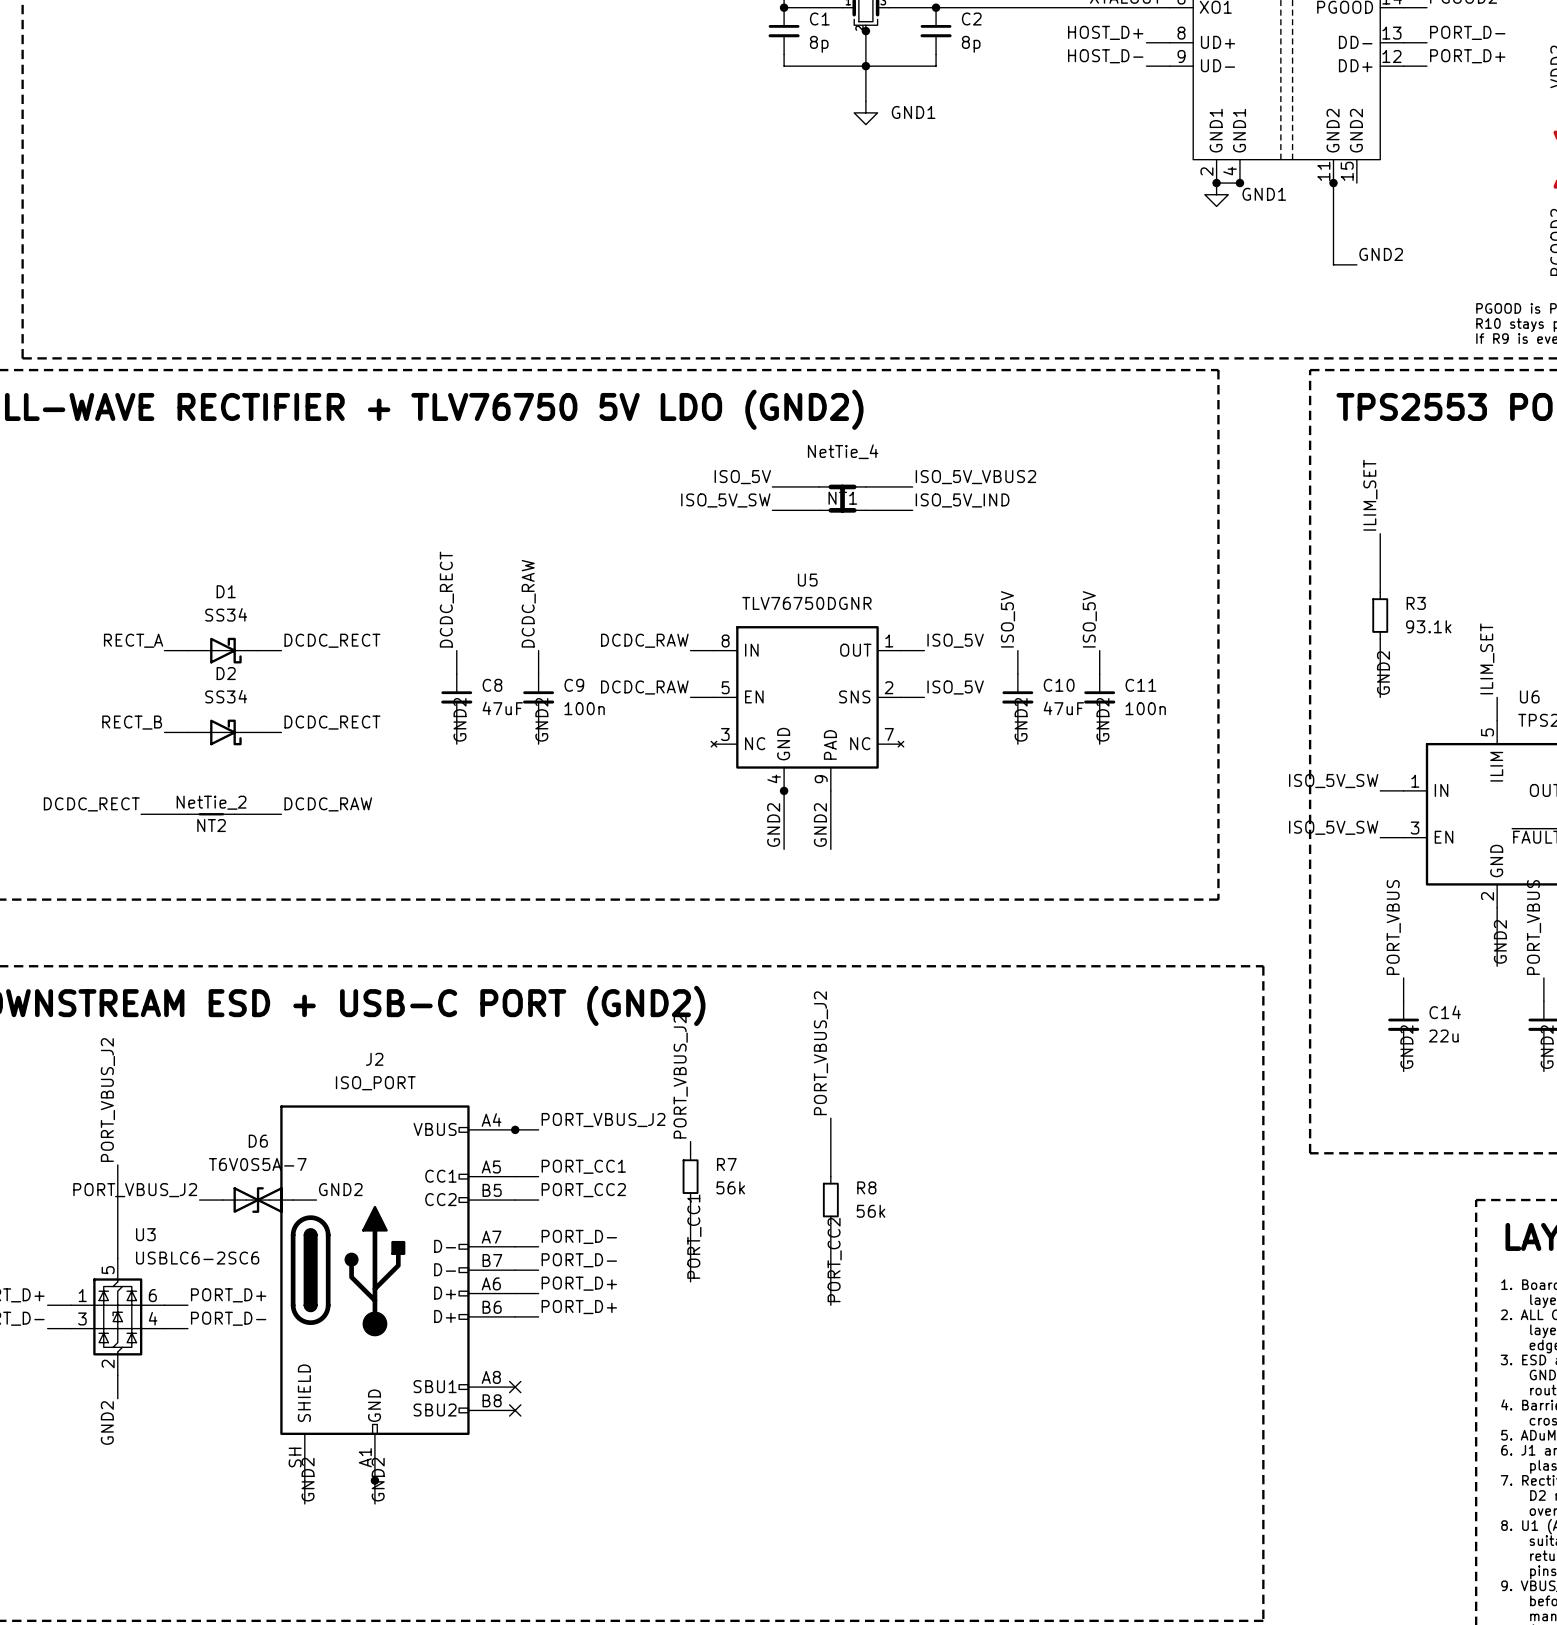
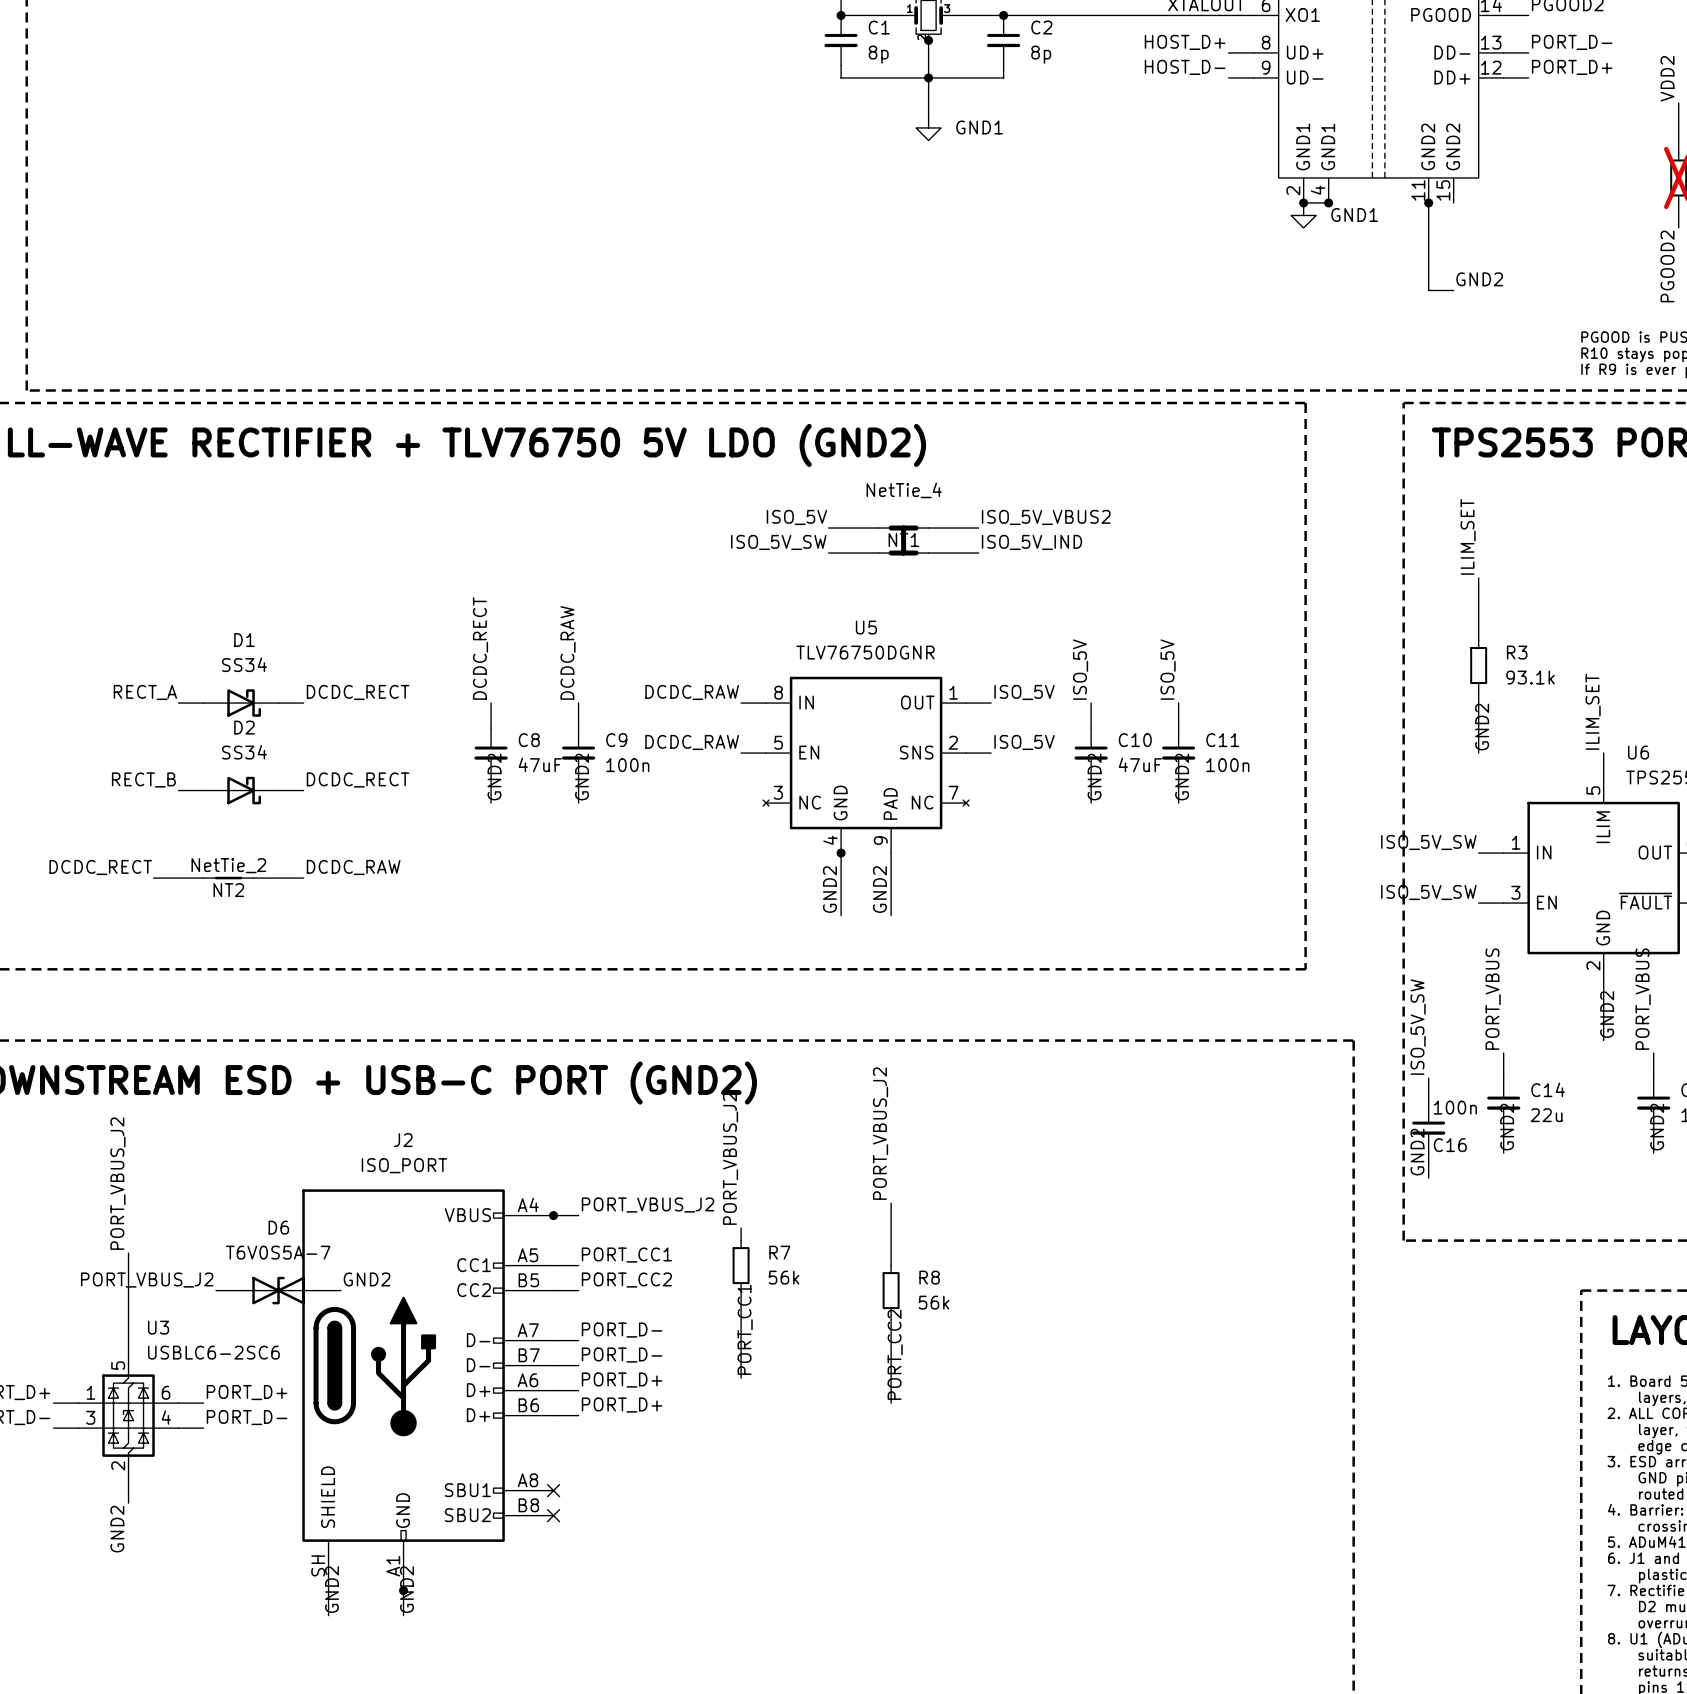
label: none -> ISO_5V_SW (1418, 1027)
wire: none -> (1428, 1078) (1428, 1103)
C16: none -> 100n (1428, 1128)
label: none -> GND2 (1417, 1152)
wire: none -> (1428, 1153) (1428, 1178)

